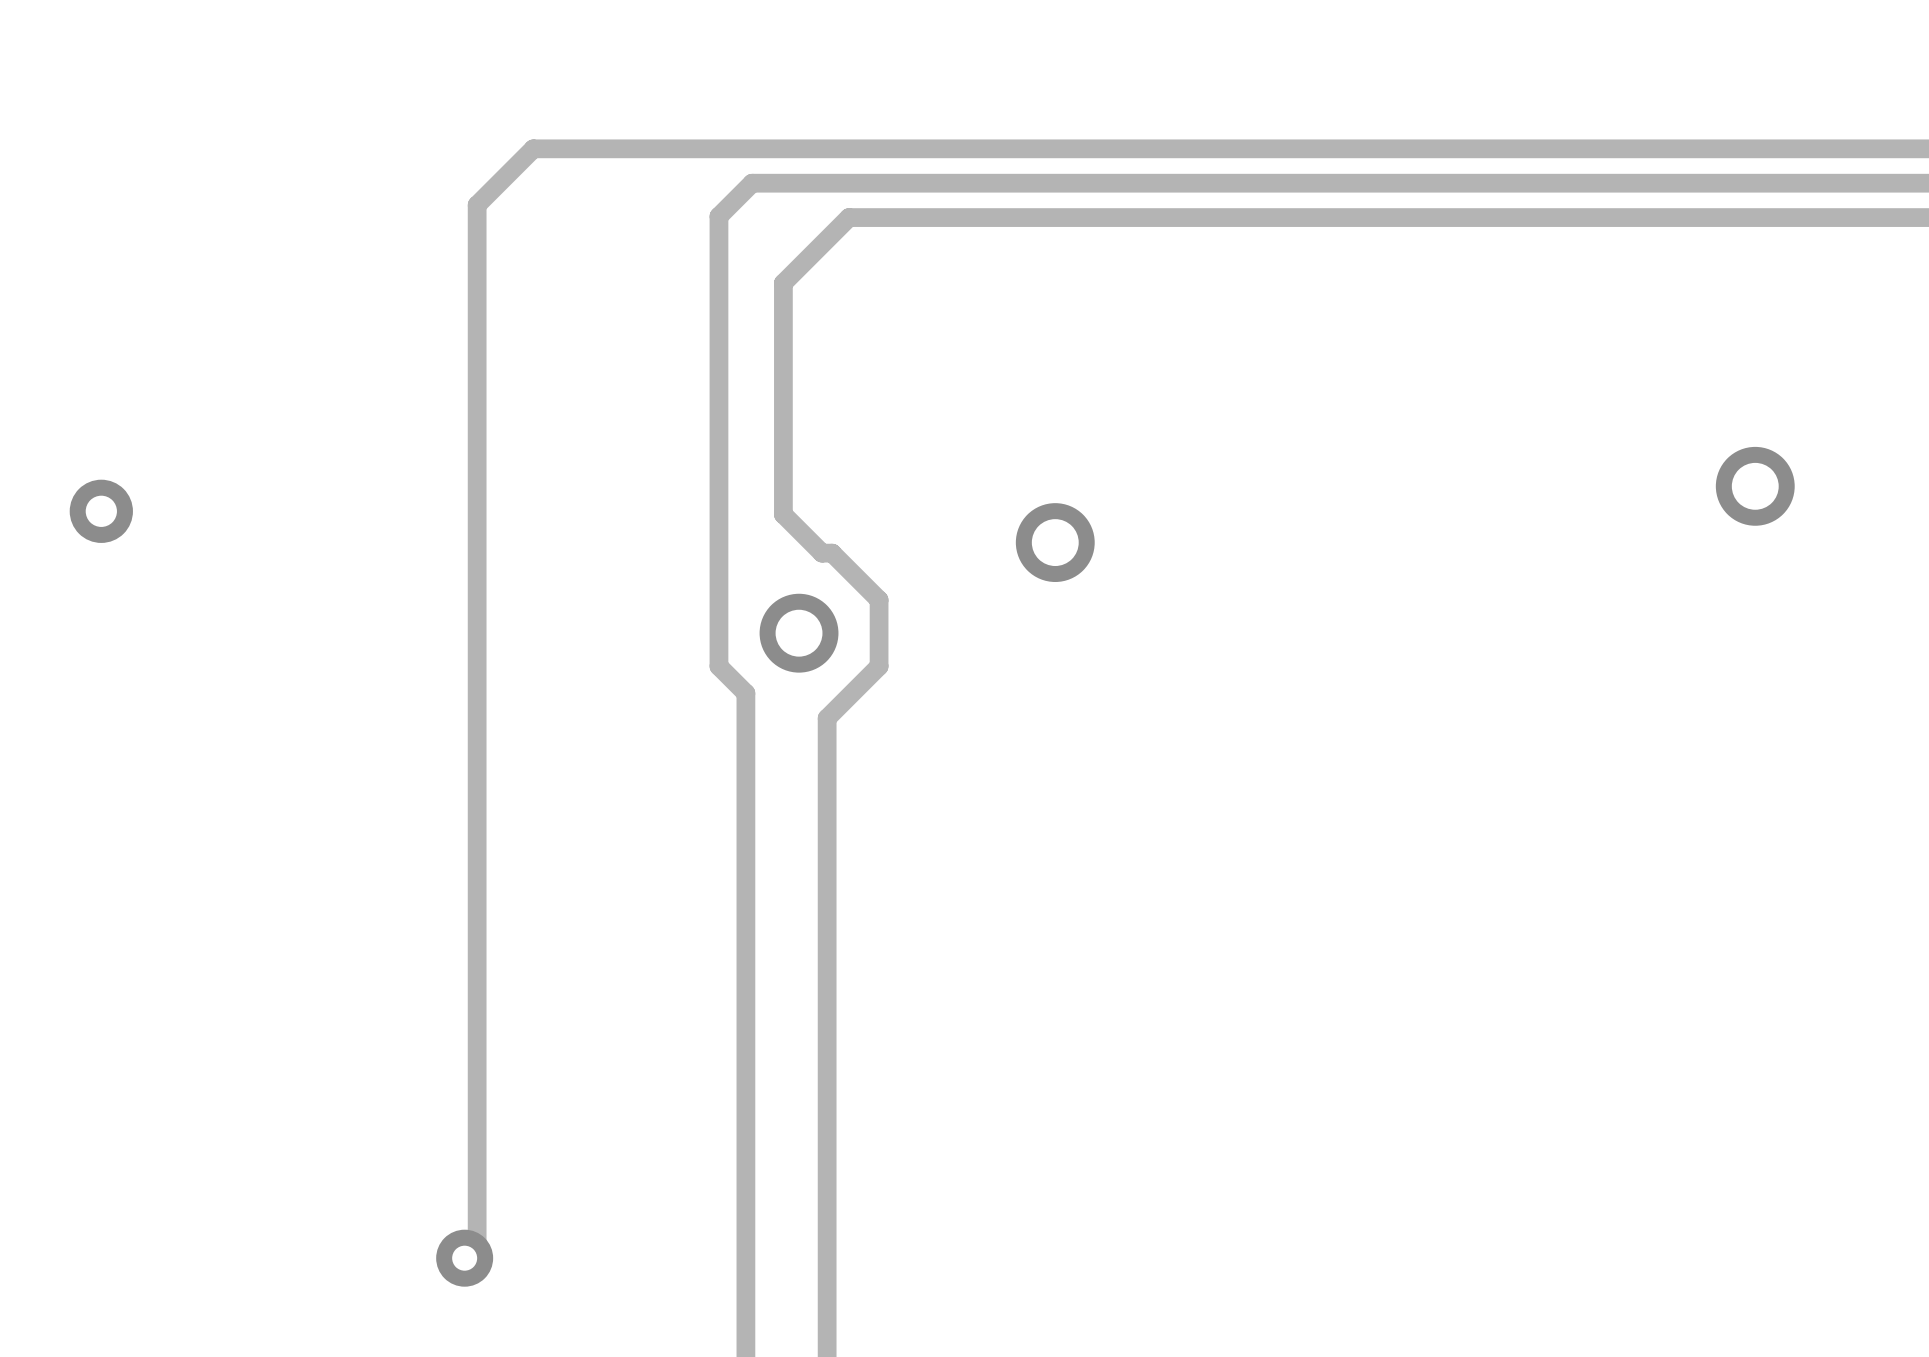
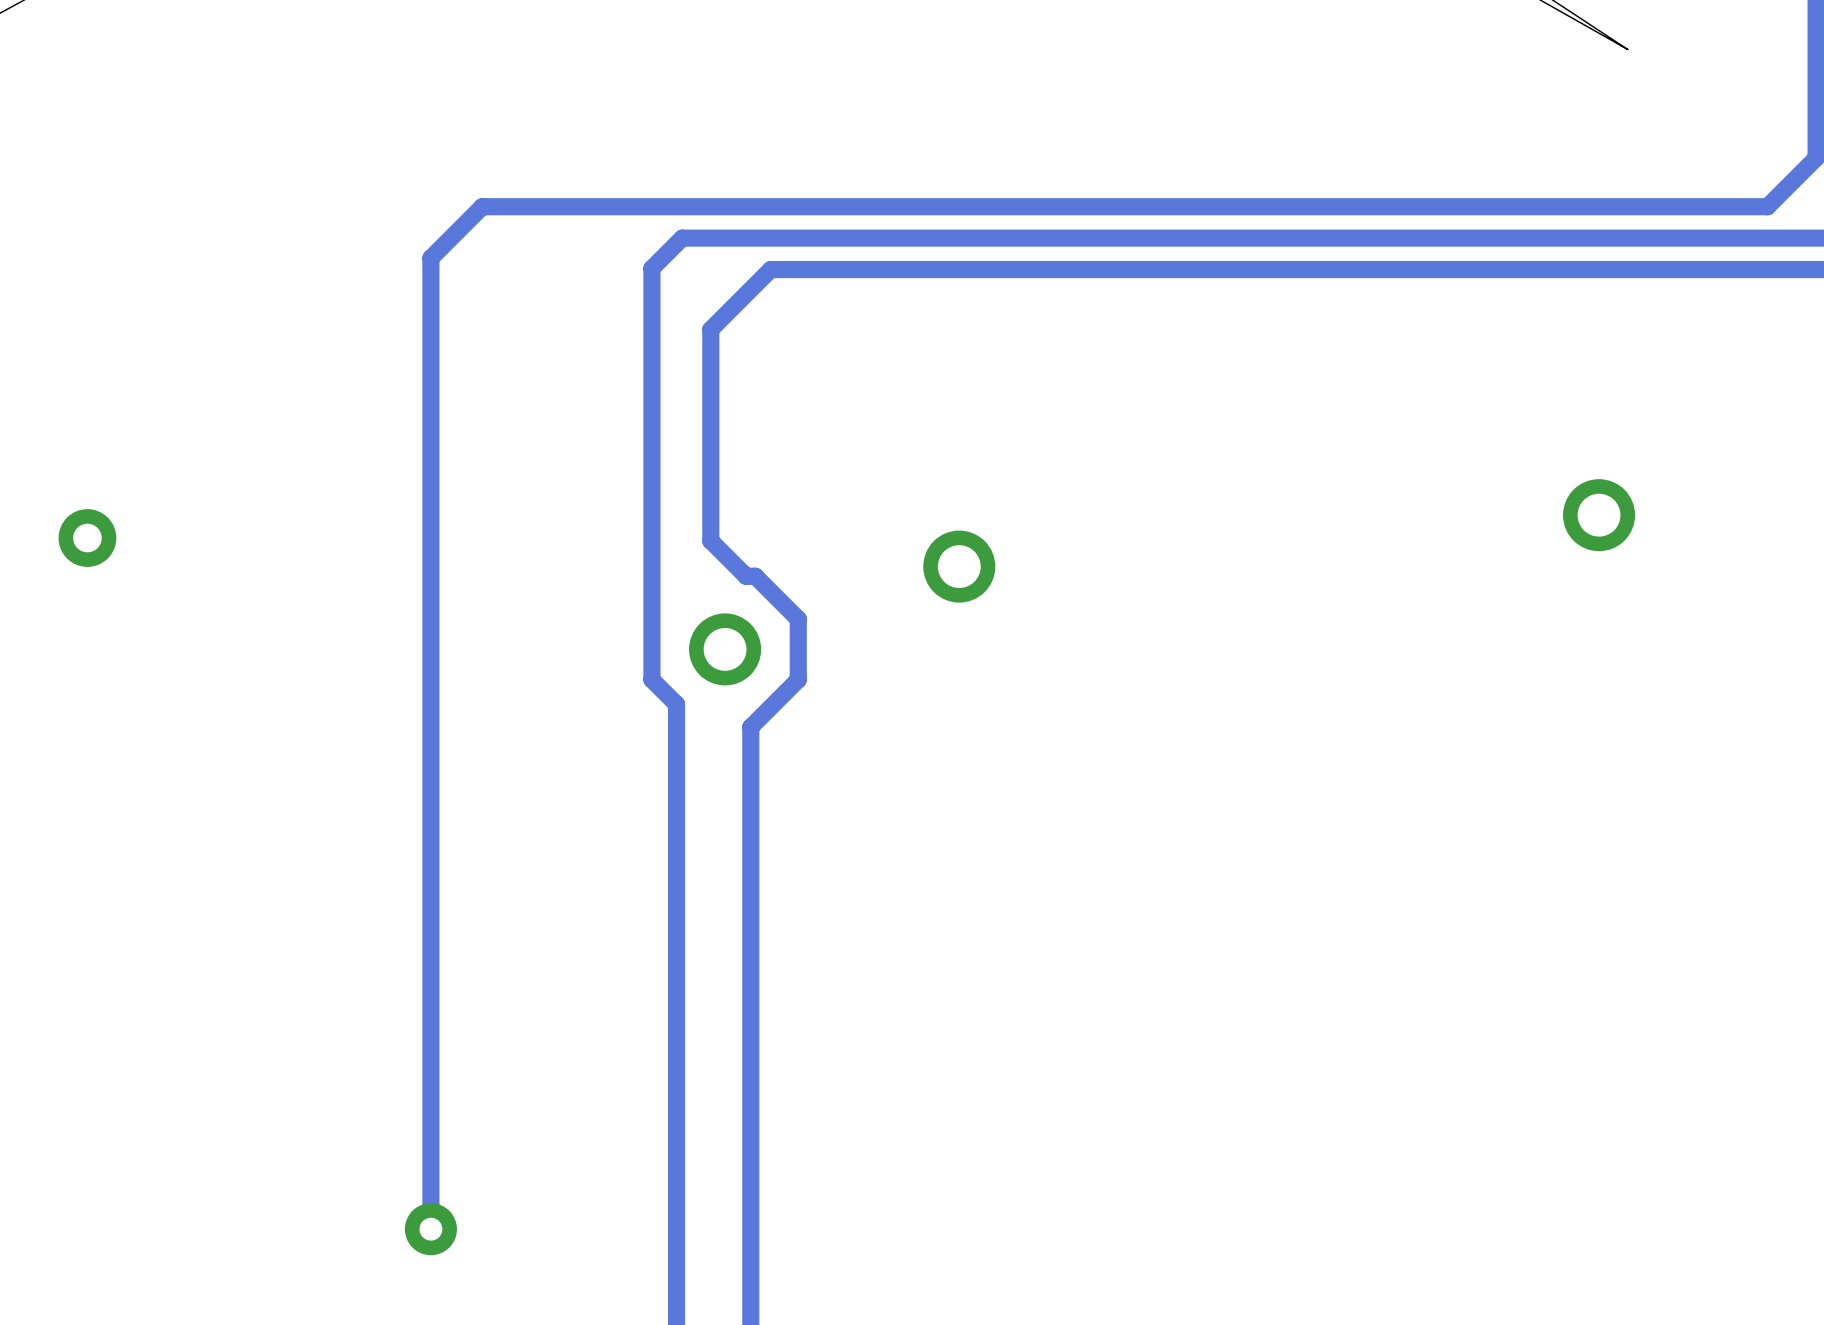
via position: (464, 1258) -> (430, 1229)

